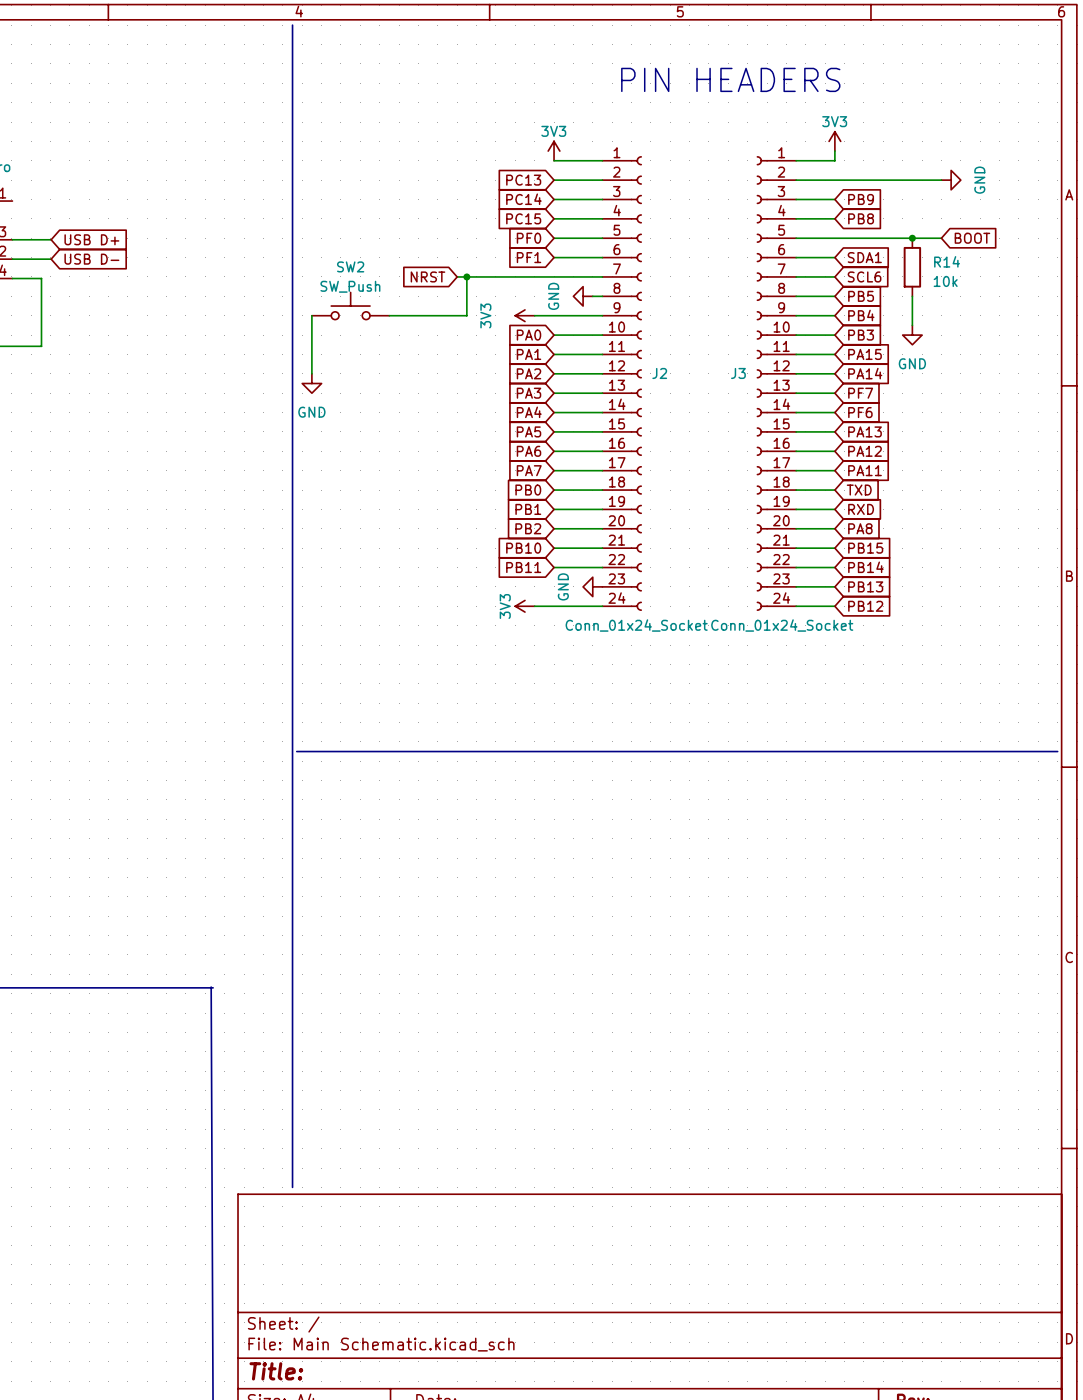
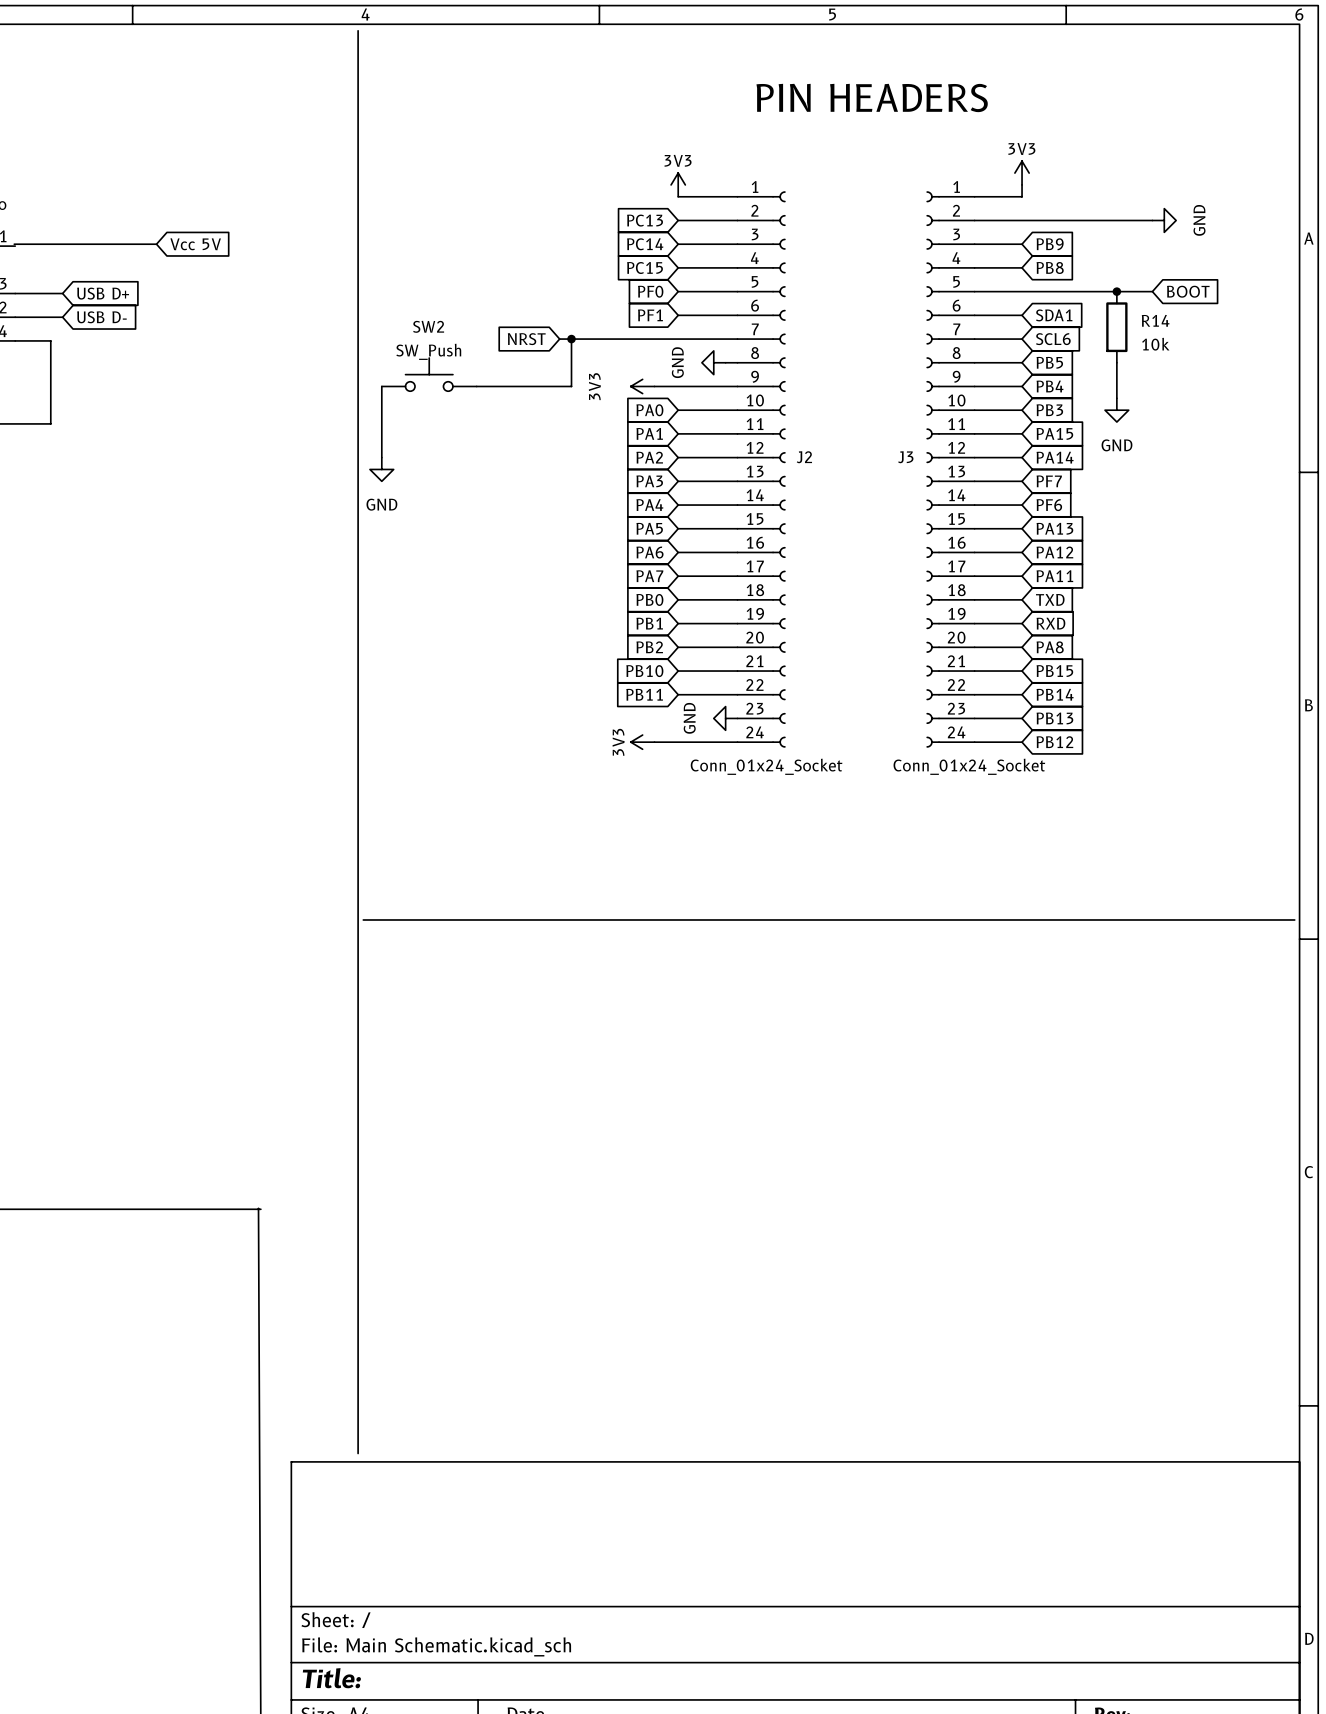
wire: none -> (14, 244) (156, 244)
global label: none -> Vcc 5V (195, 244)

